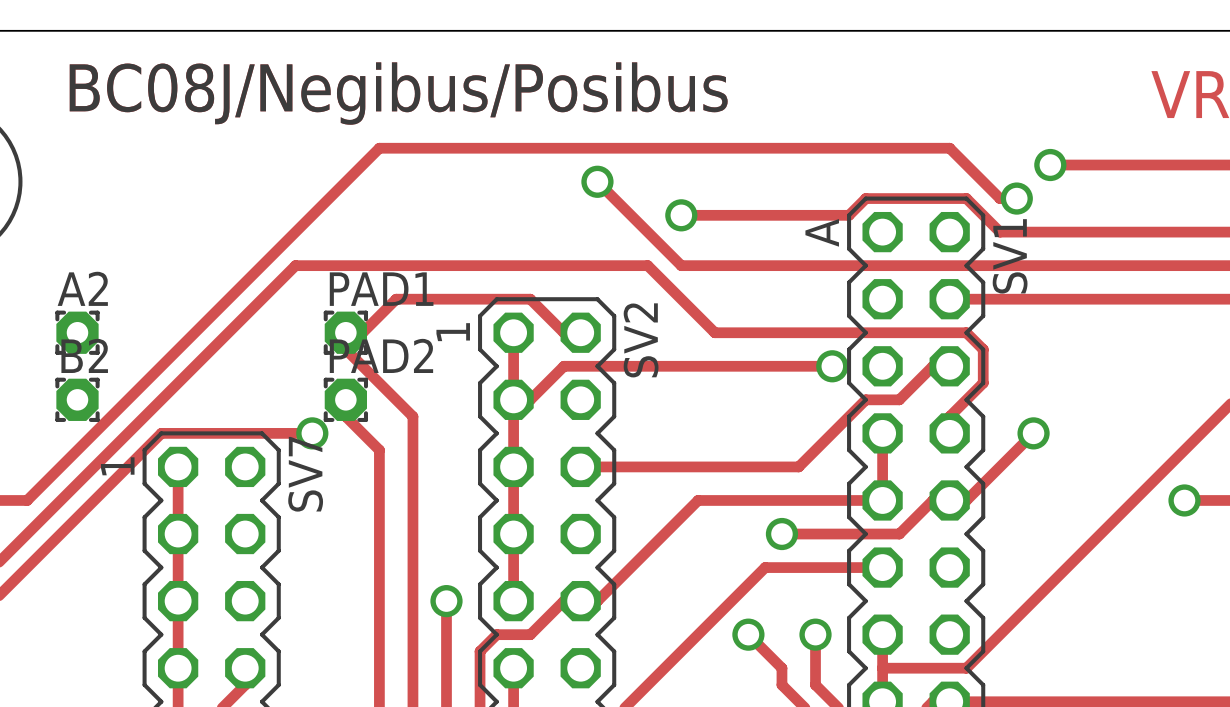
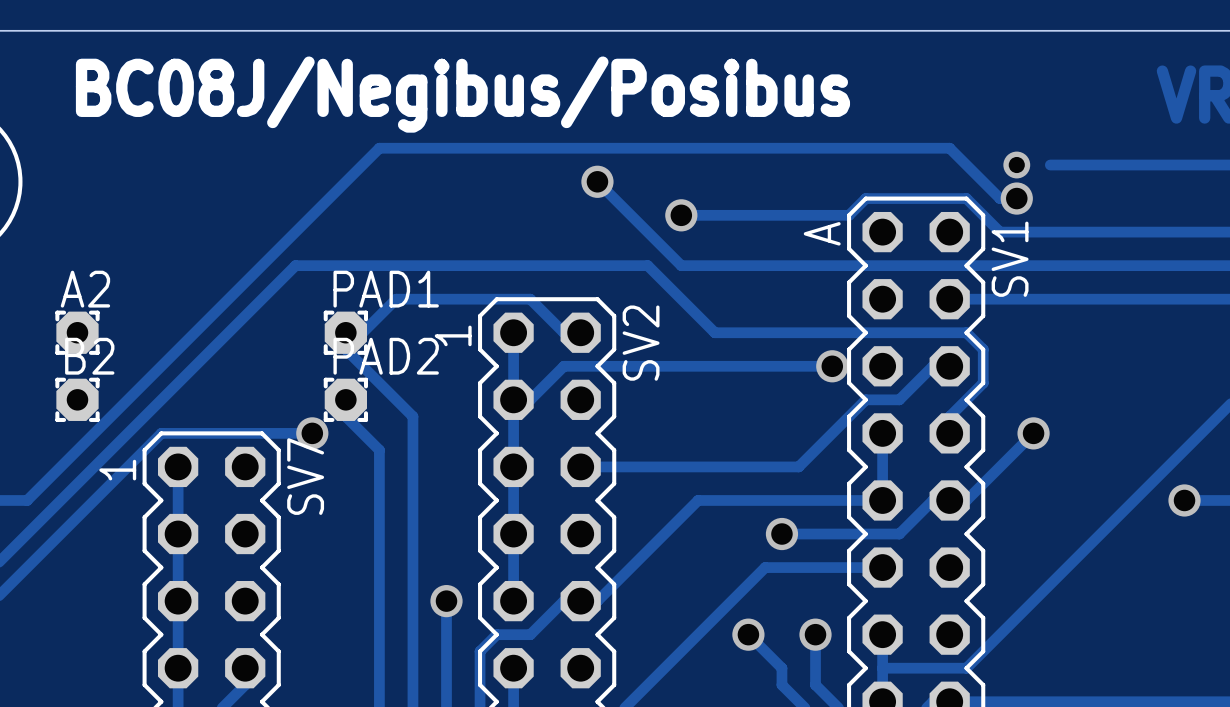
via: none -> (1016, 165)
via: (1050, 165) -> none

